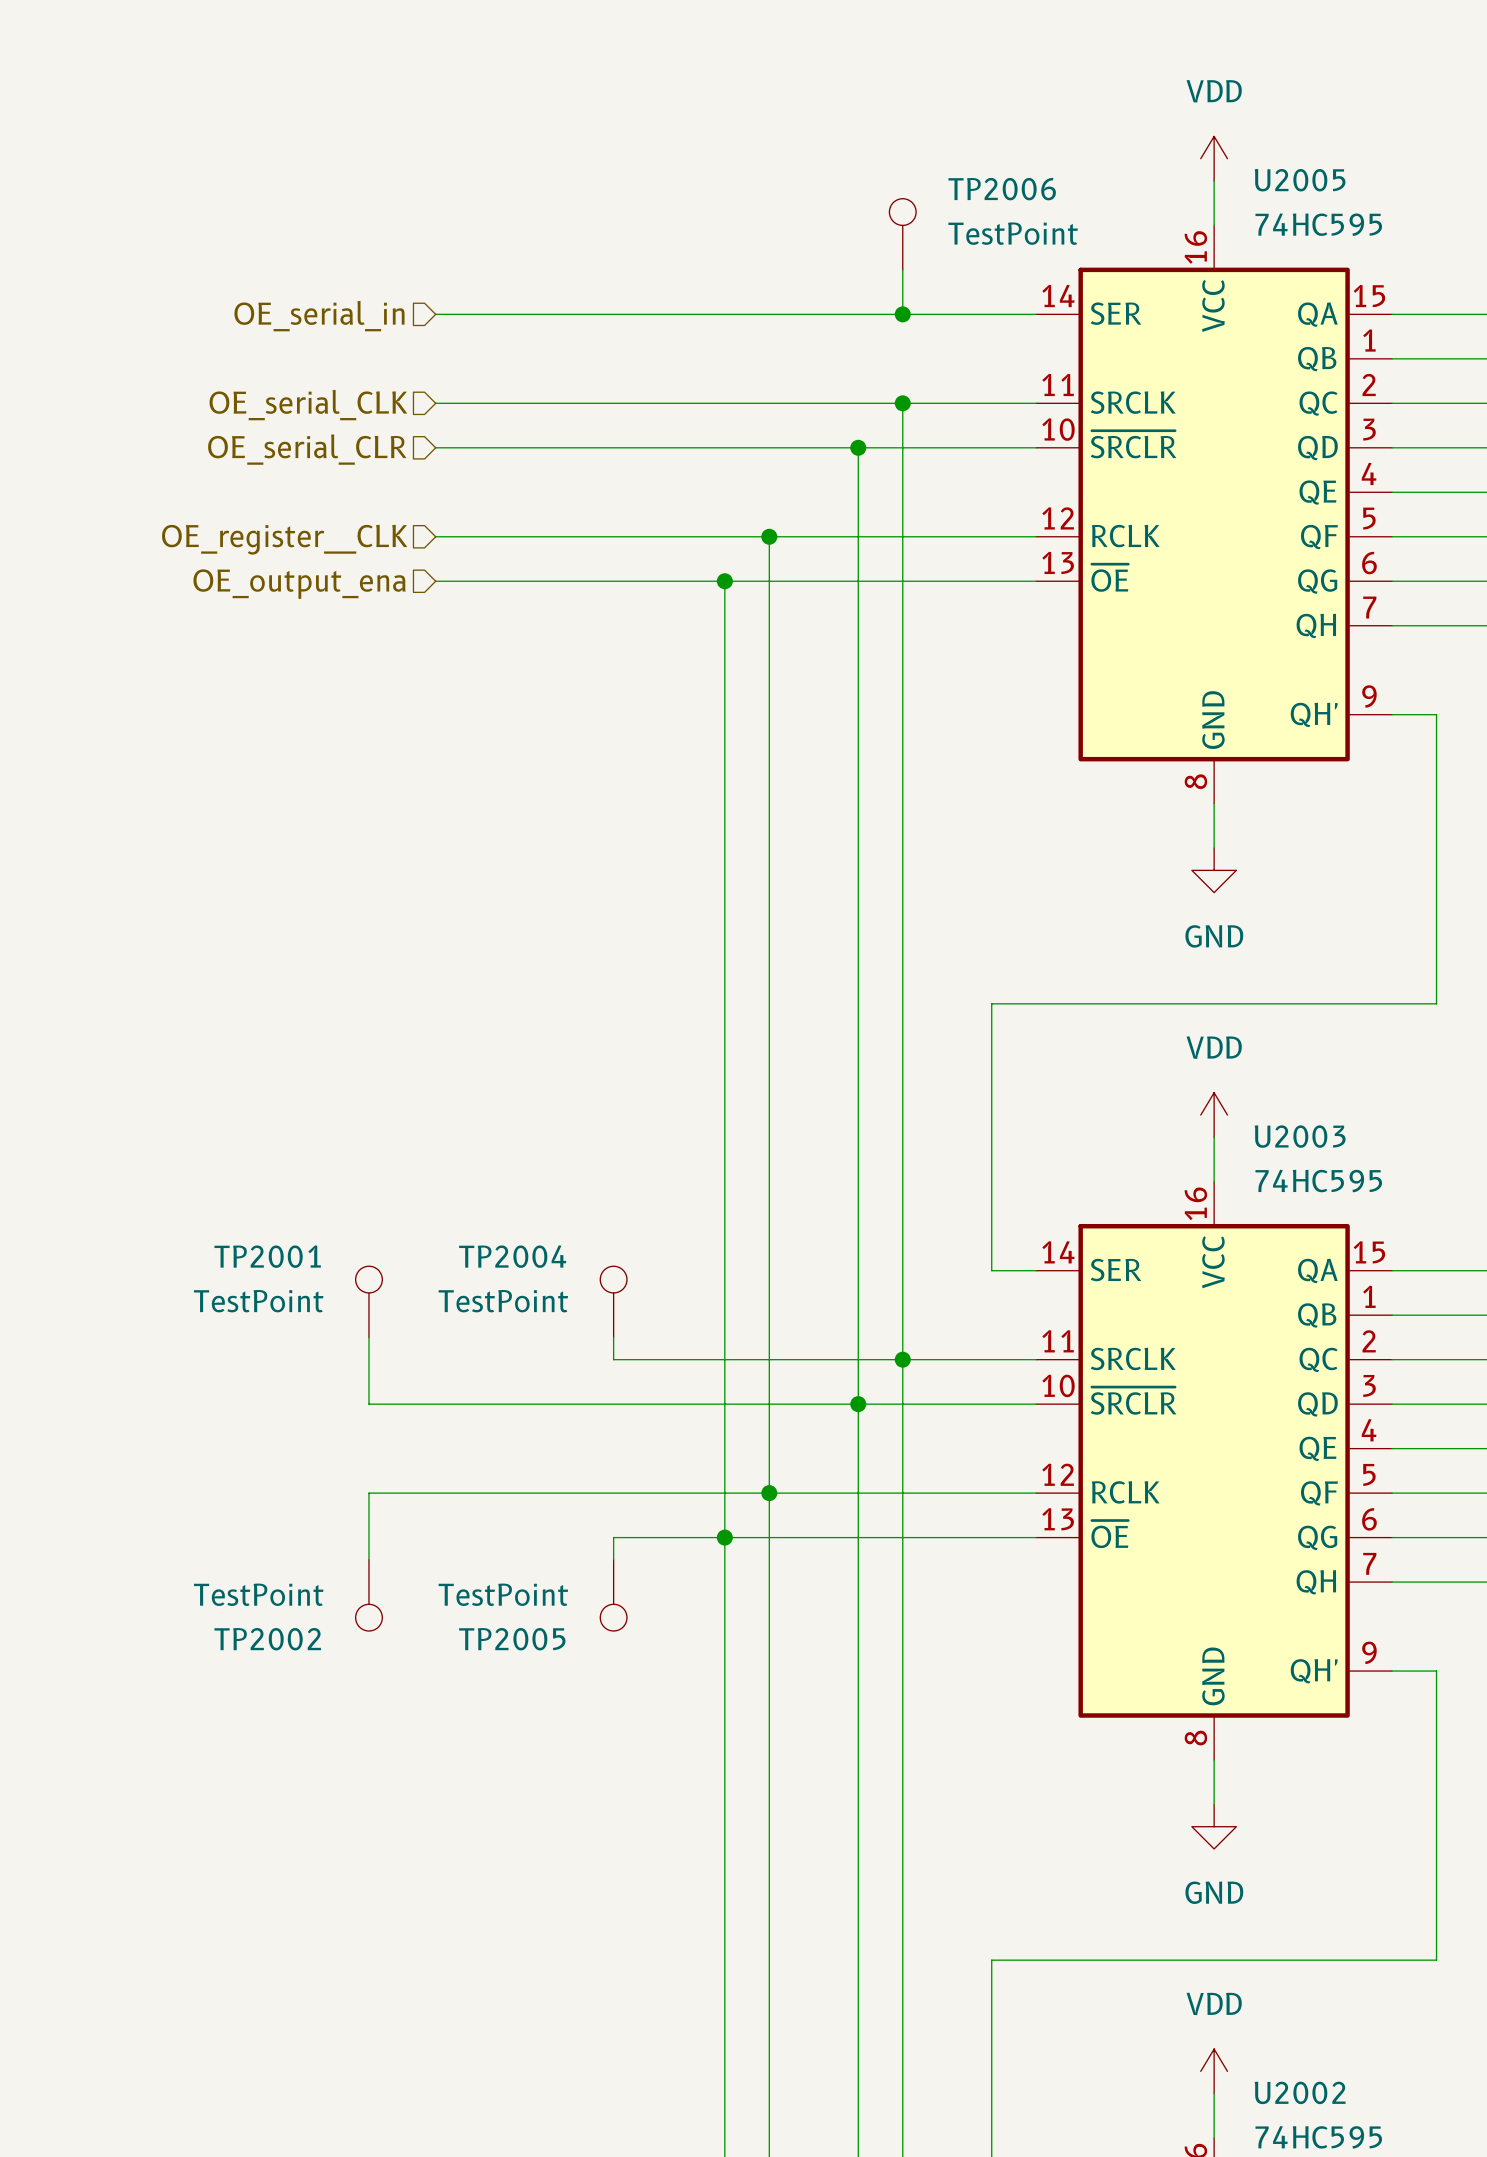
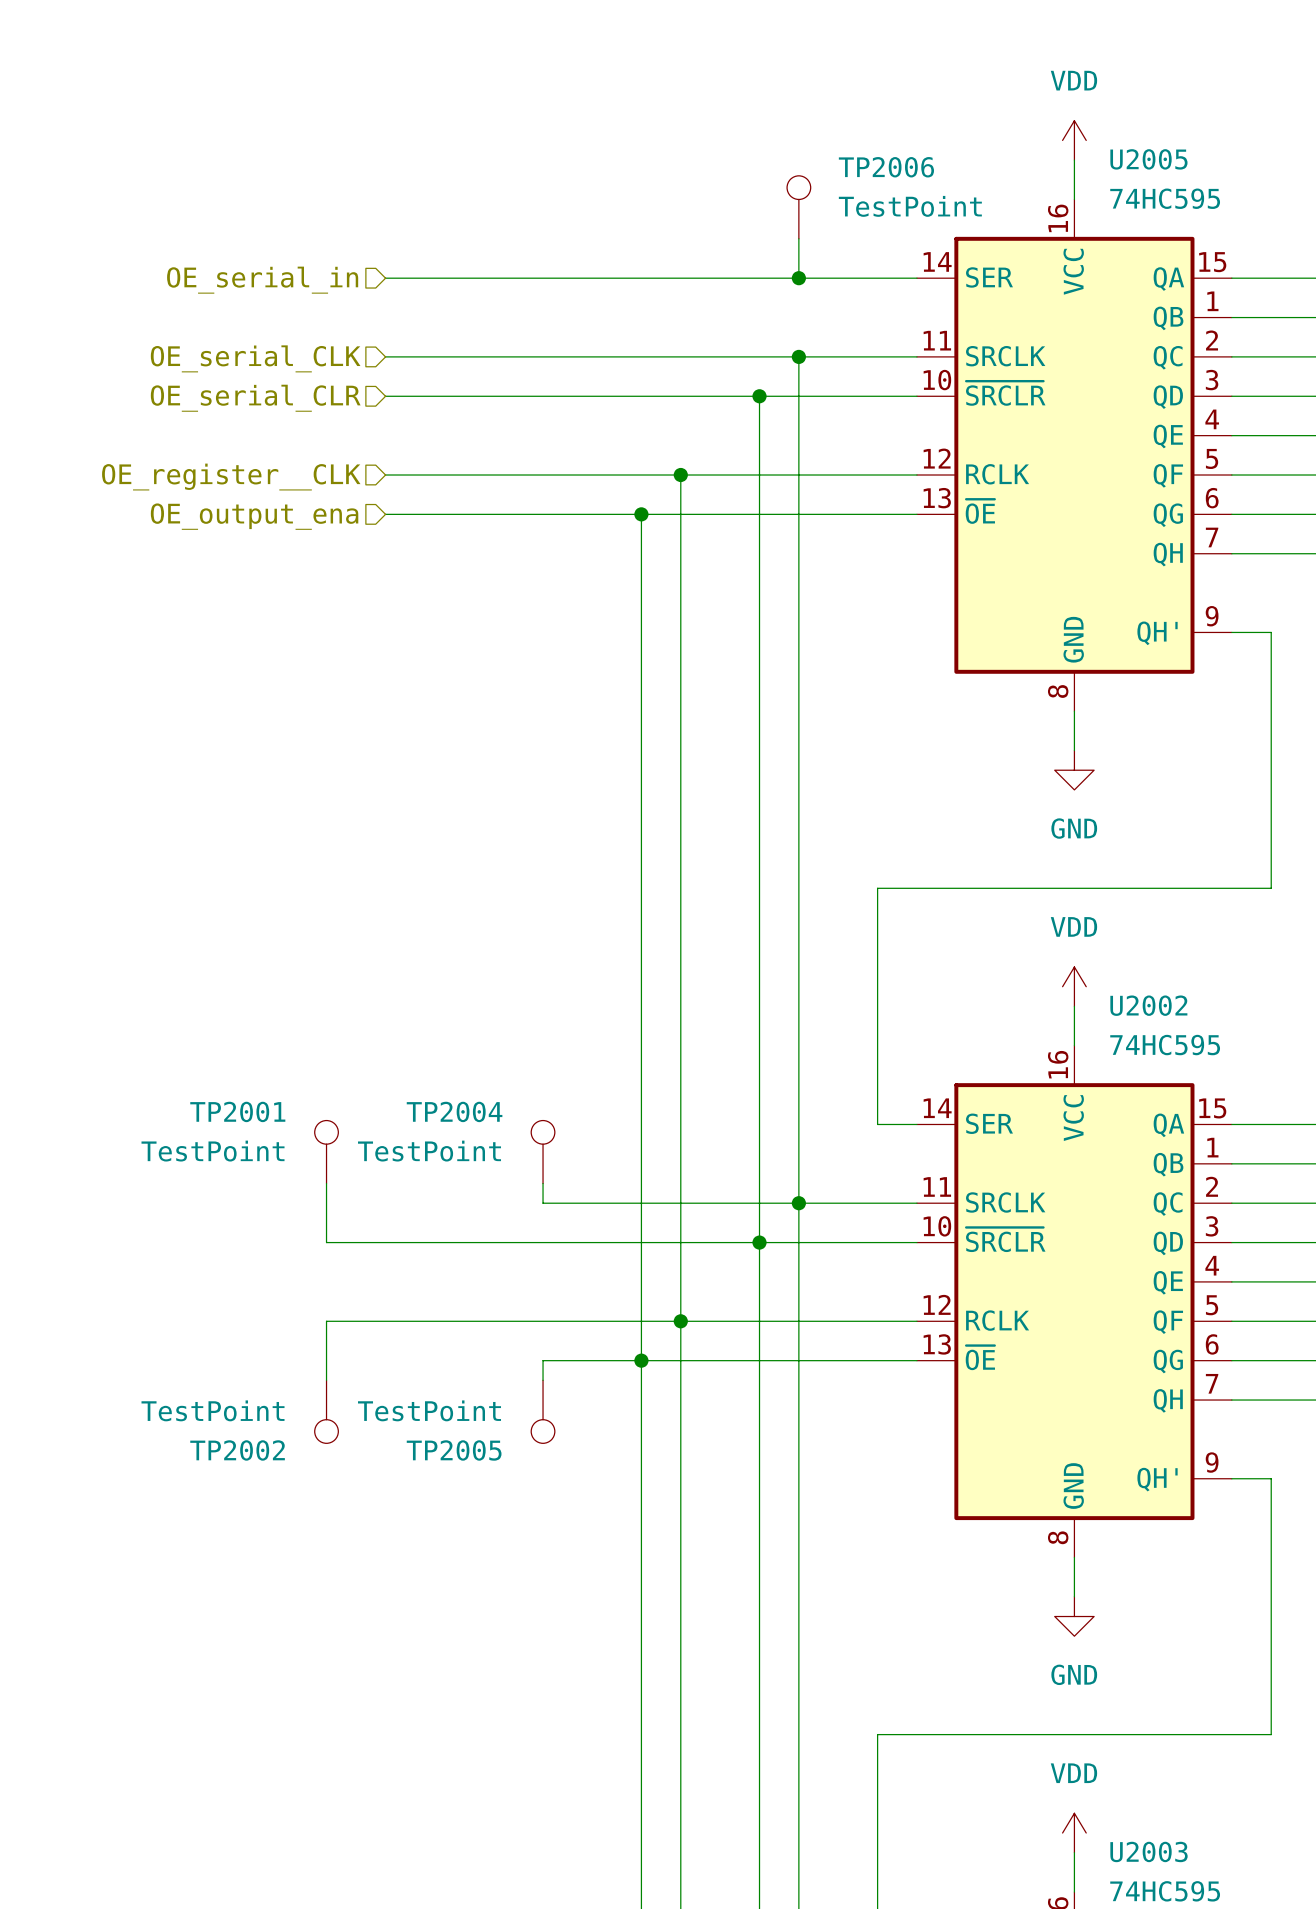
U2003 name: U2003 (1300, 1136) -> U2002 (1148, 1005)
U2002 name: U2002 (1300, 2092) -> U2003 (1149, 1851)

